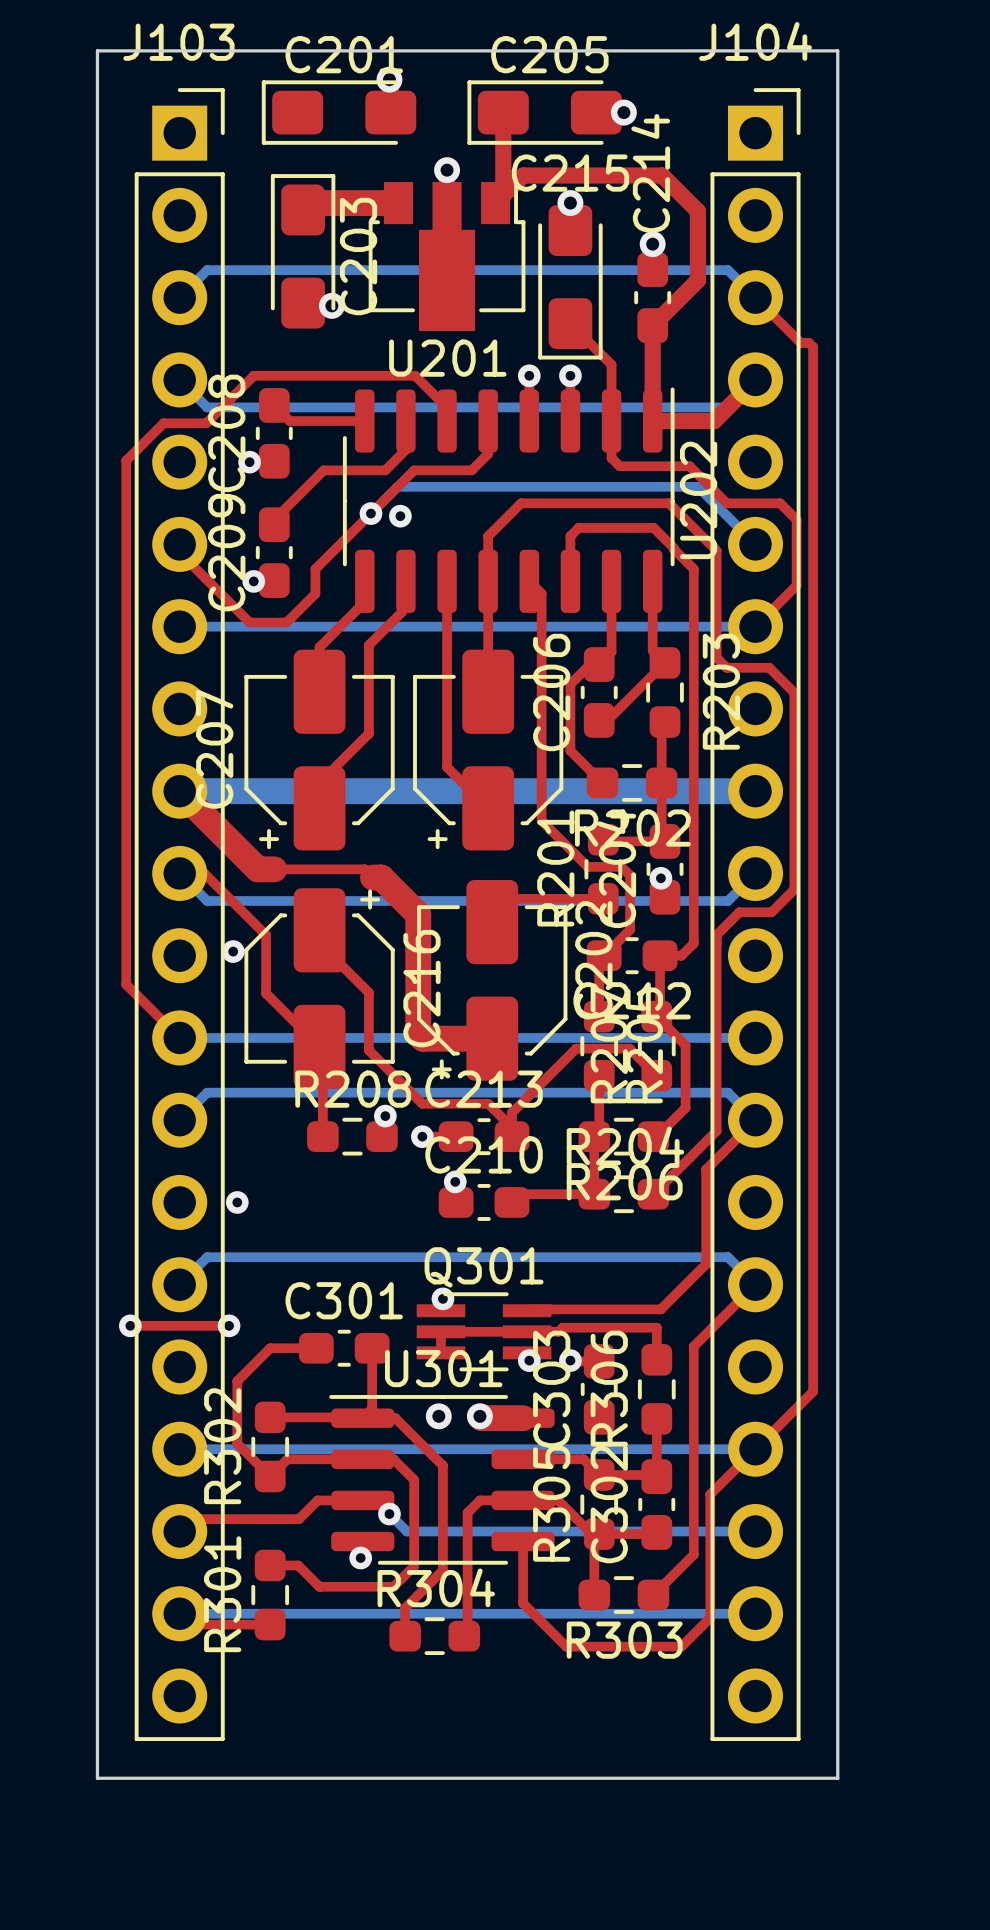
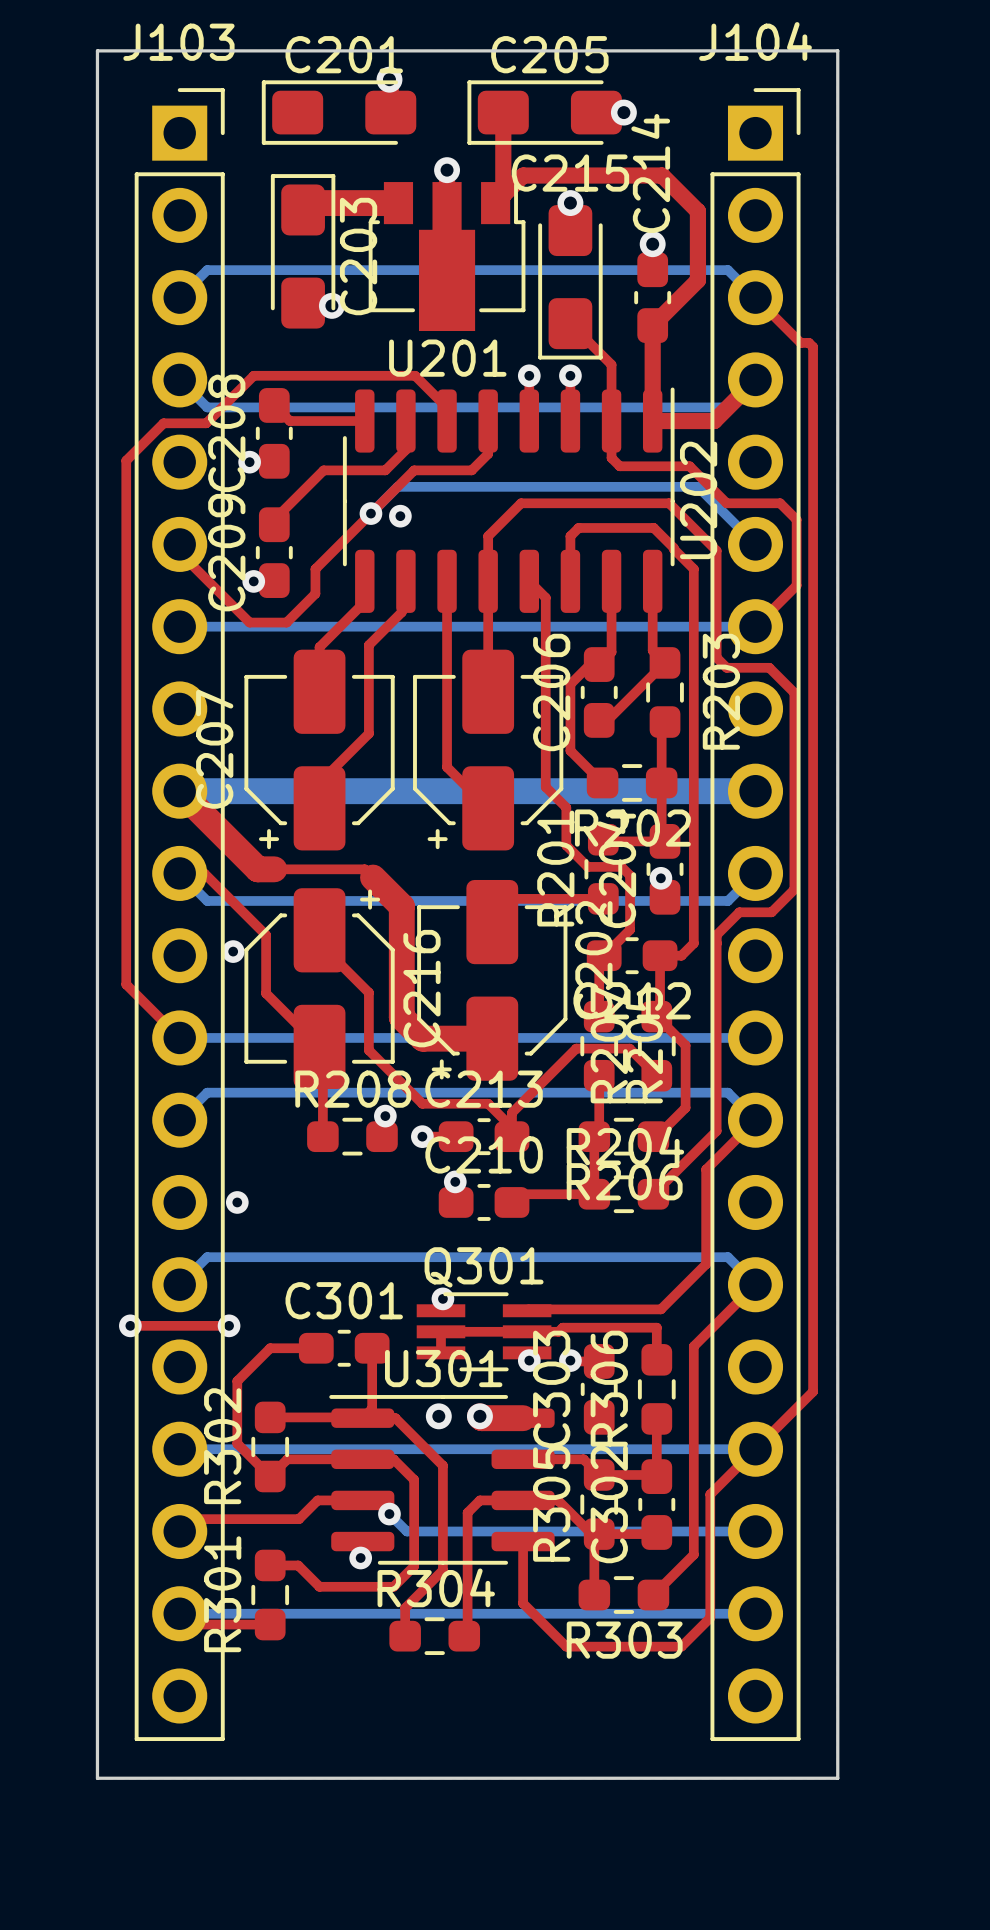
top track: (541, 593) (541, 820) (566, 845) -> (541, 593) (545, 597) (545, 787) (566, 807) (566, 845)
top track: (373, 877) (381, 877) (418, 914) (418, 1033) -> (373, 877) (401, 906) (401, 1017) (418, 1033)

